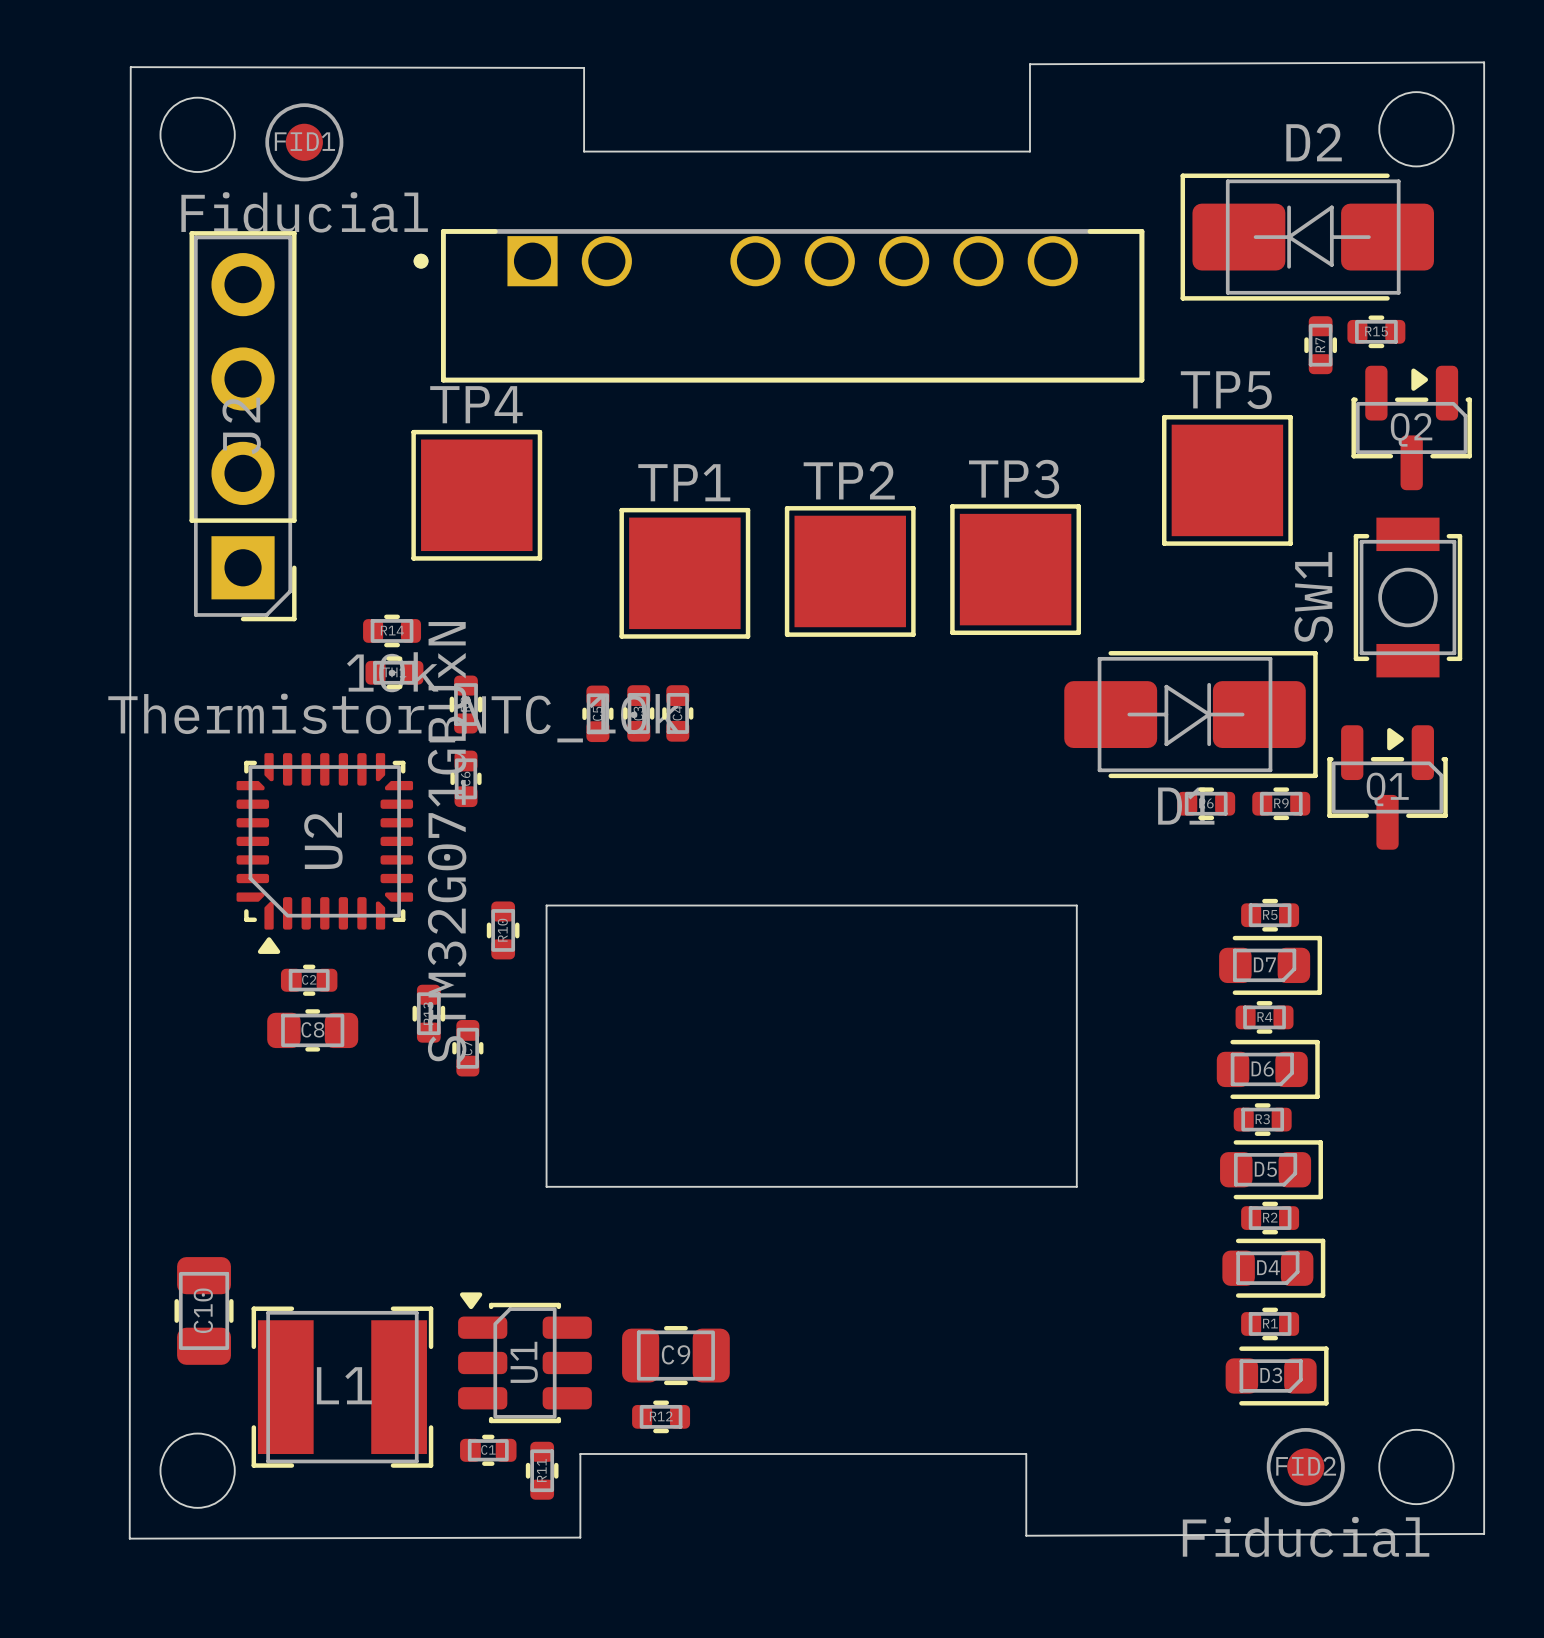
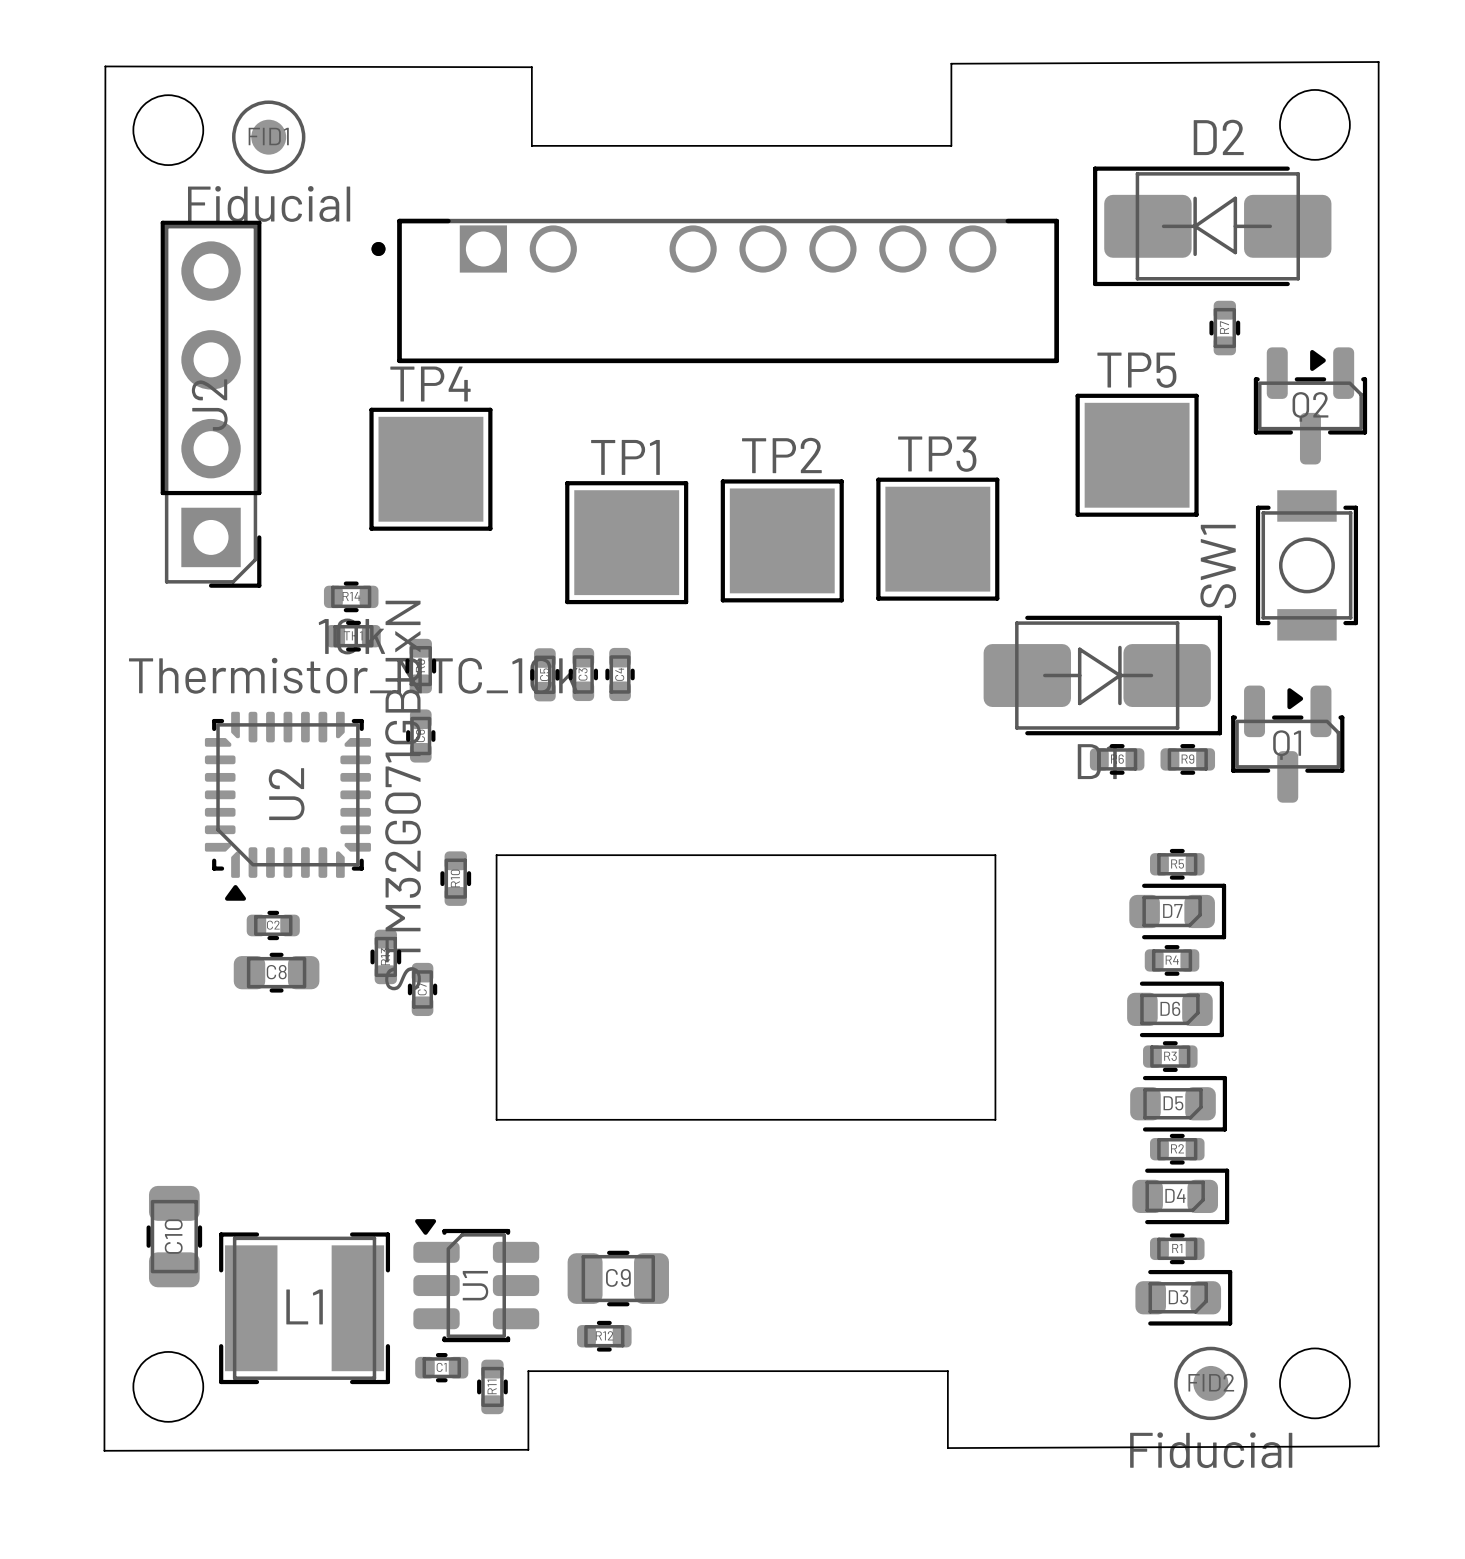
R15: (1376, 331) -> none

